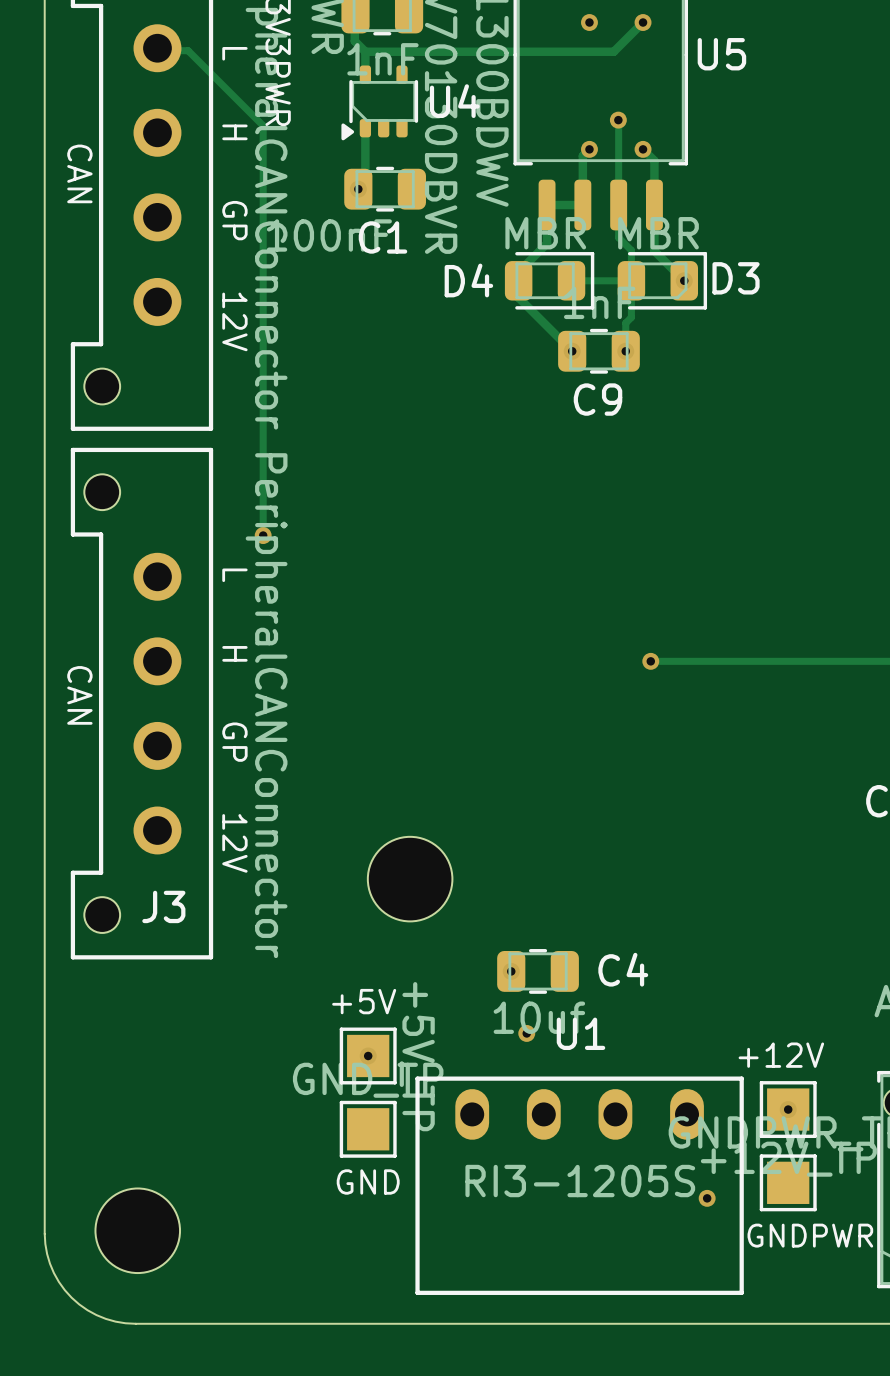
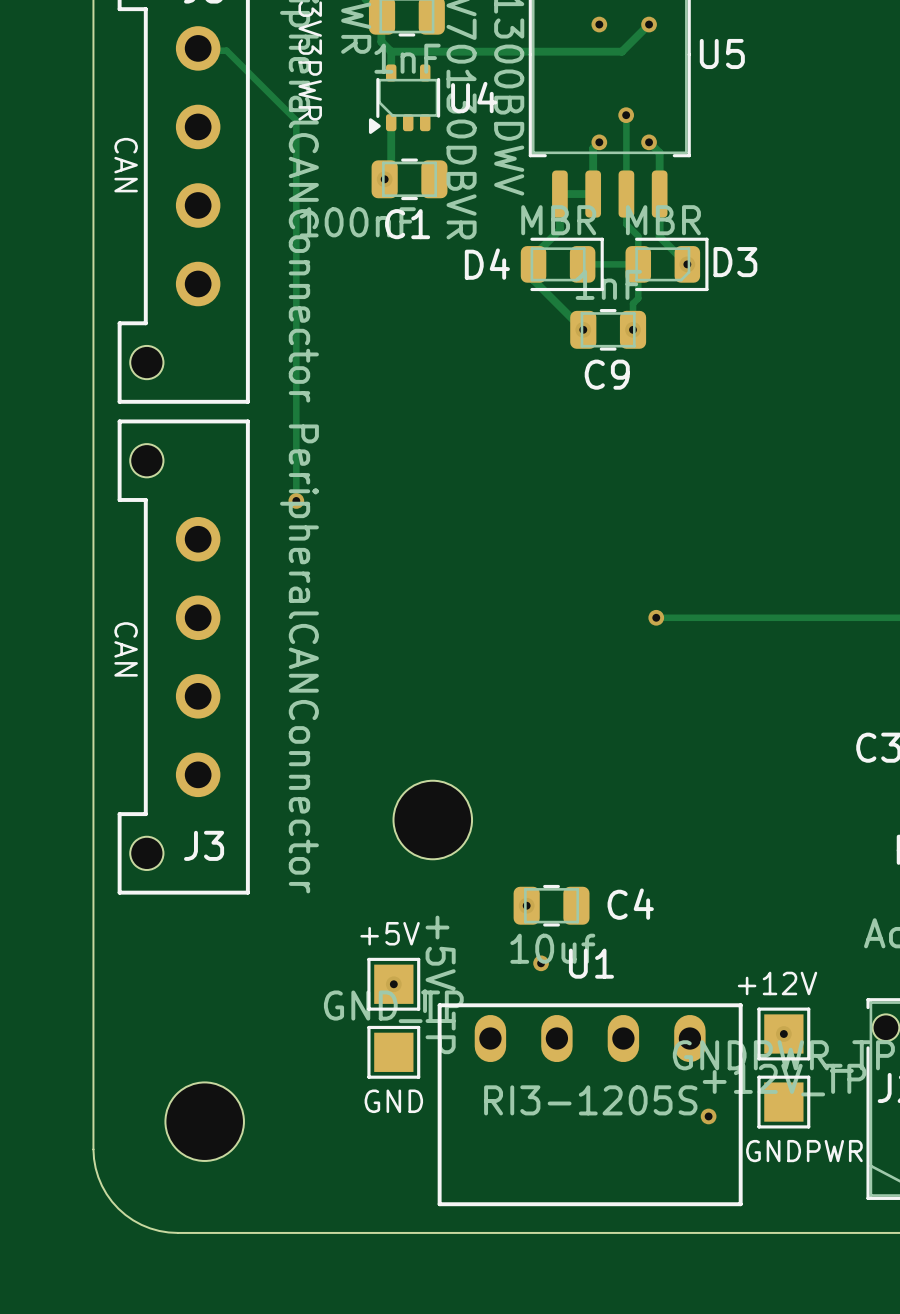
text: L (234, 53) -> none
text: H (234, 132) -> none
text: GP (234, 220) -> none
text: 12V (234, 321) -> none
text: L (234, 575) -> none
text: H (234, 653) -> none
text: GP (234, 742) -> none
text: 12V (234, 843) -> none
part position: (137, 1230) -> (204, 1121)

